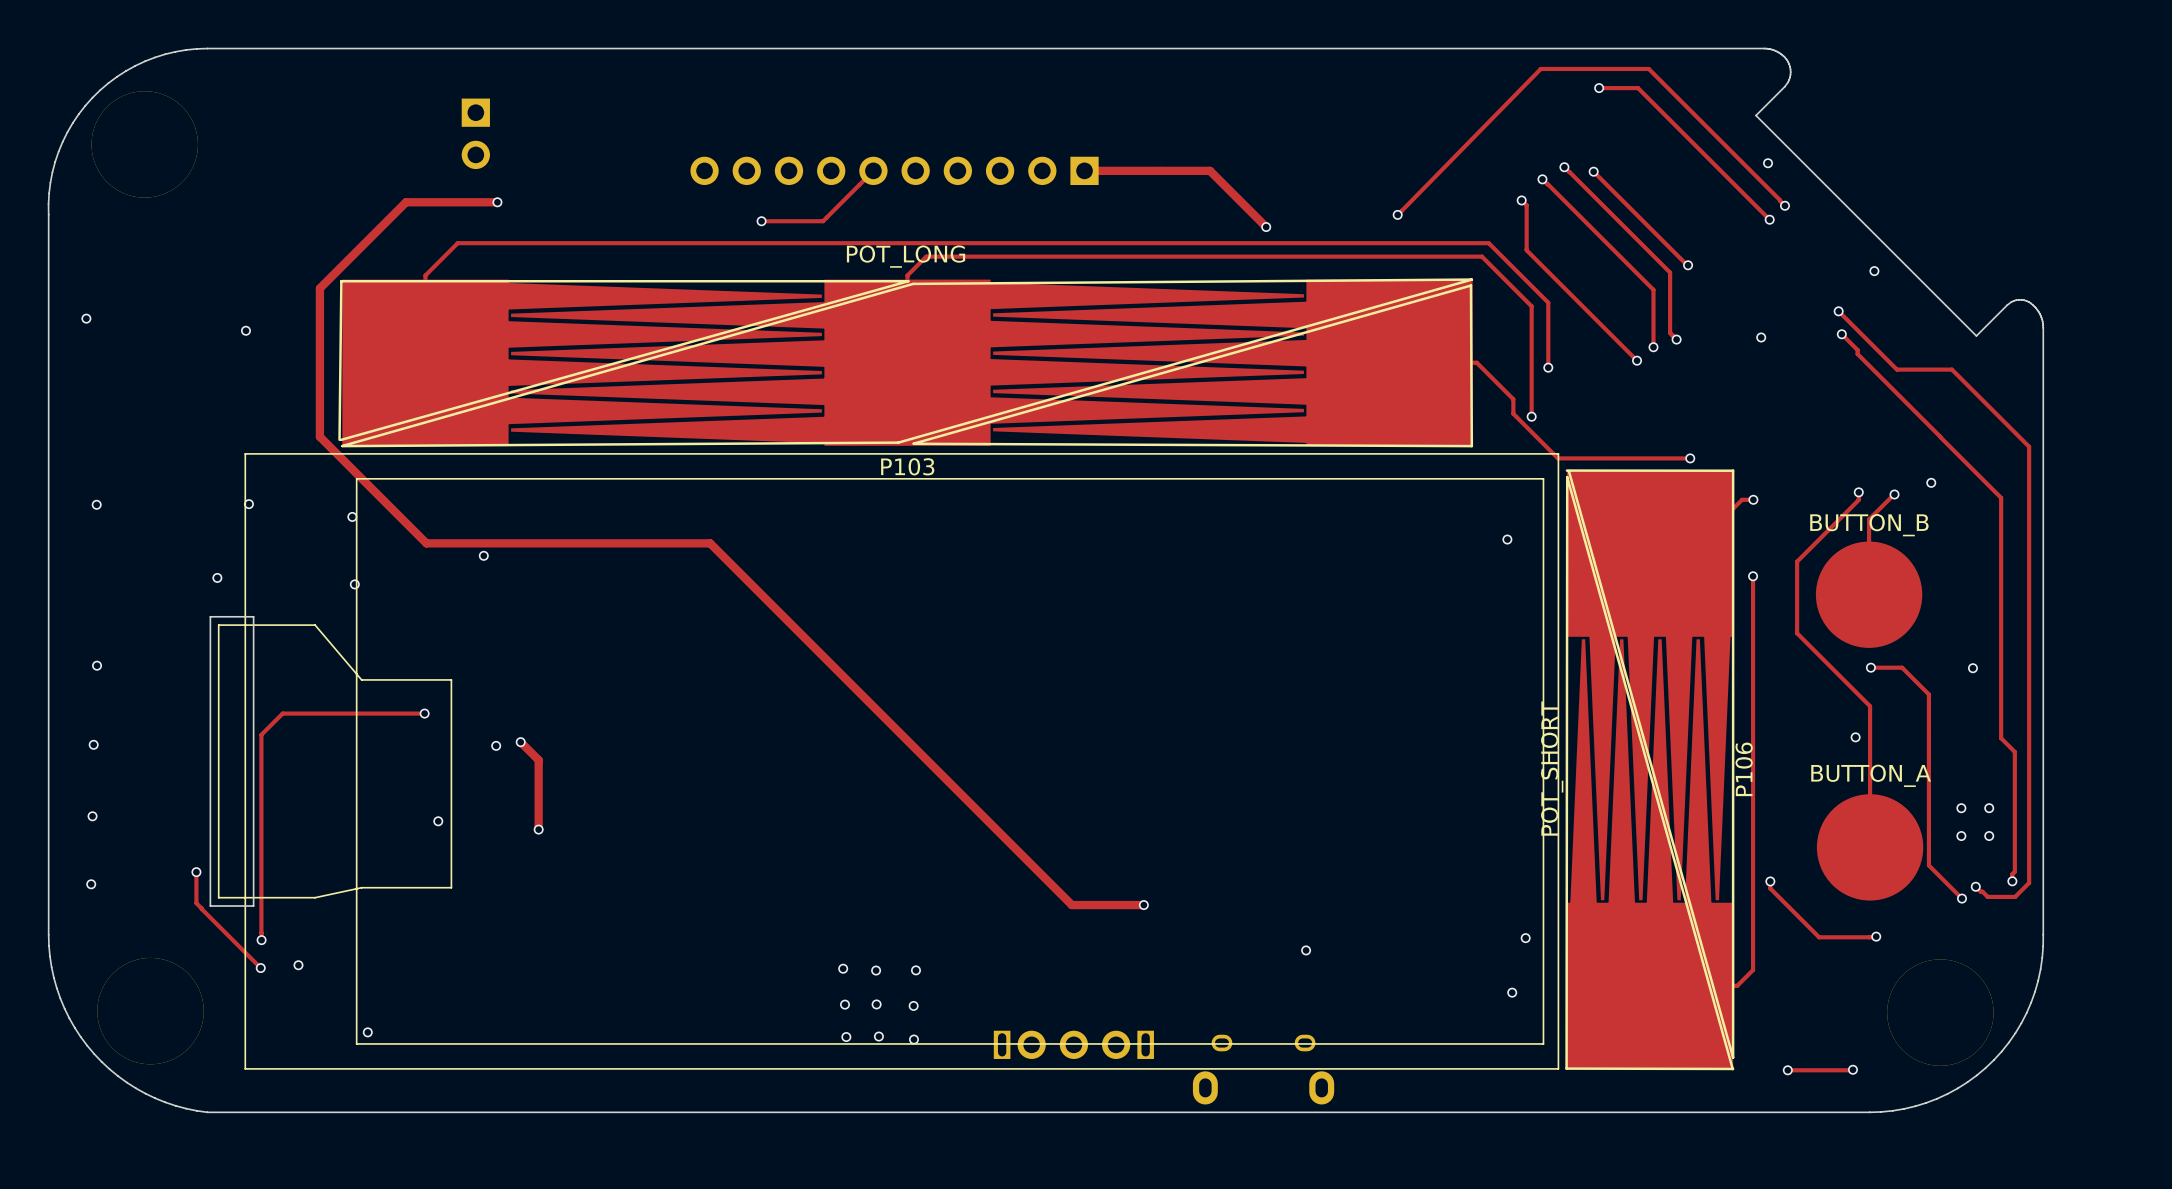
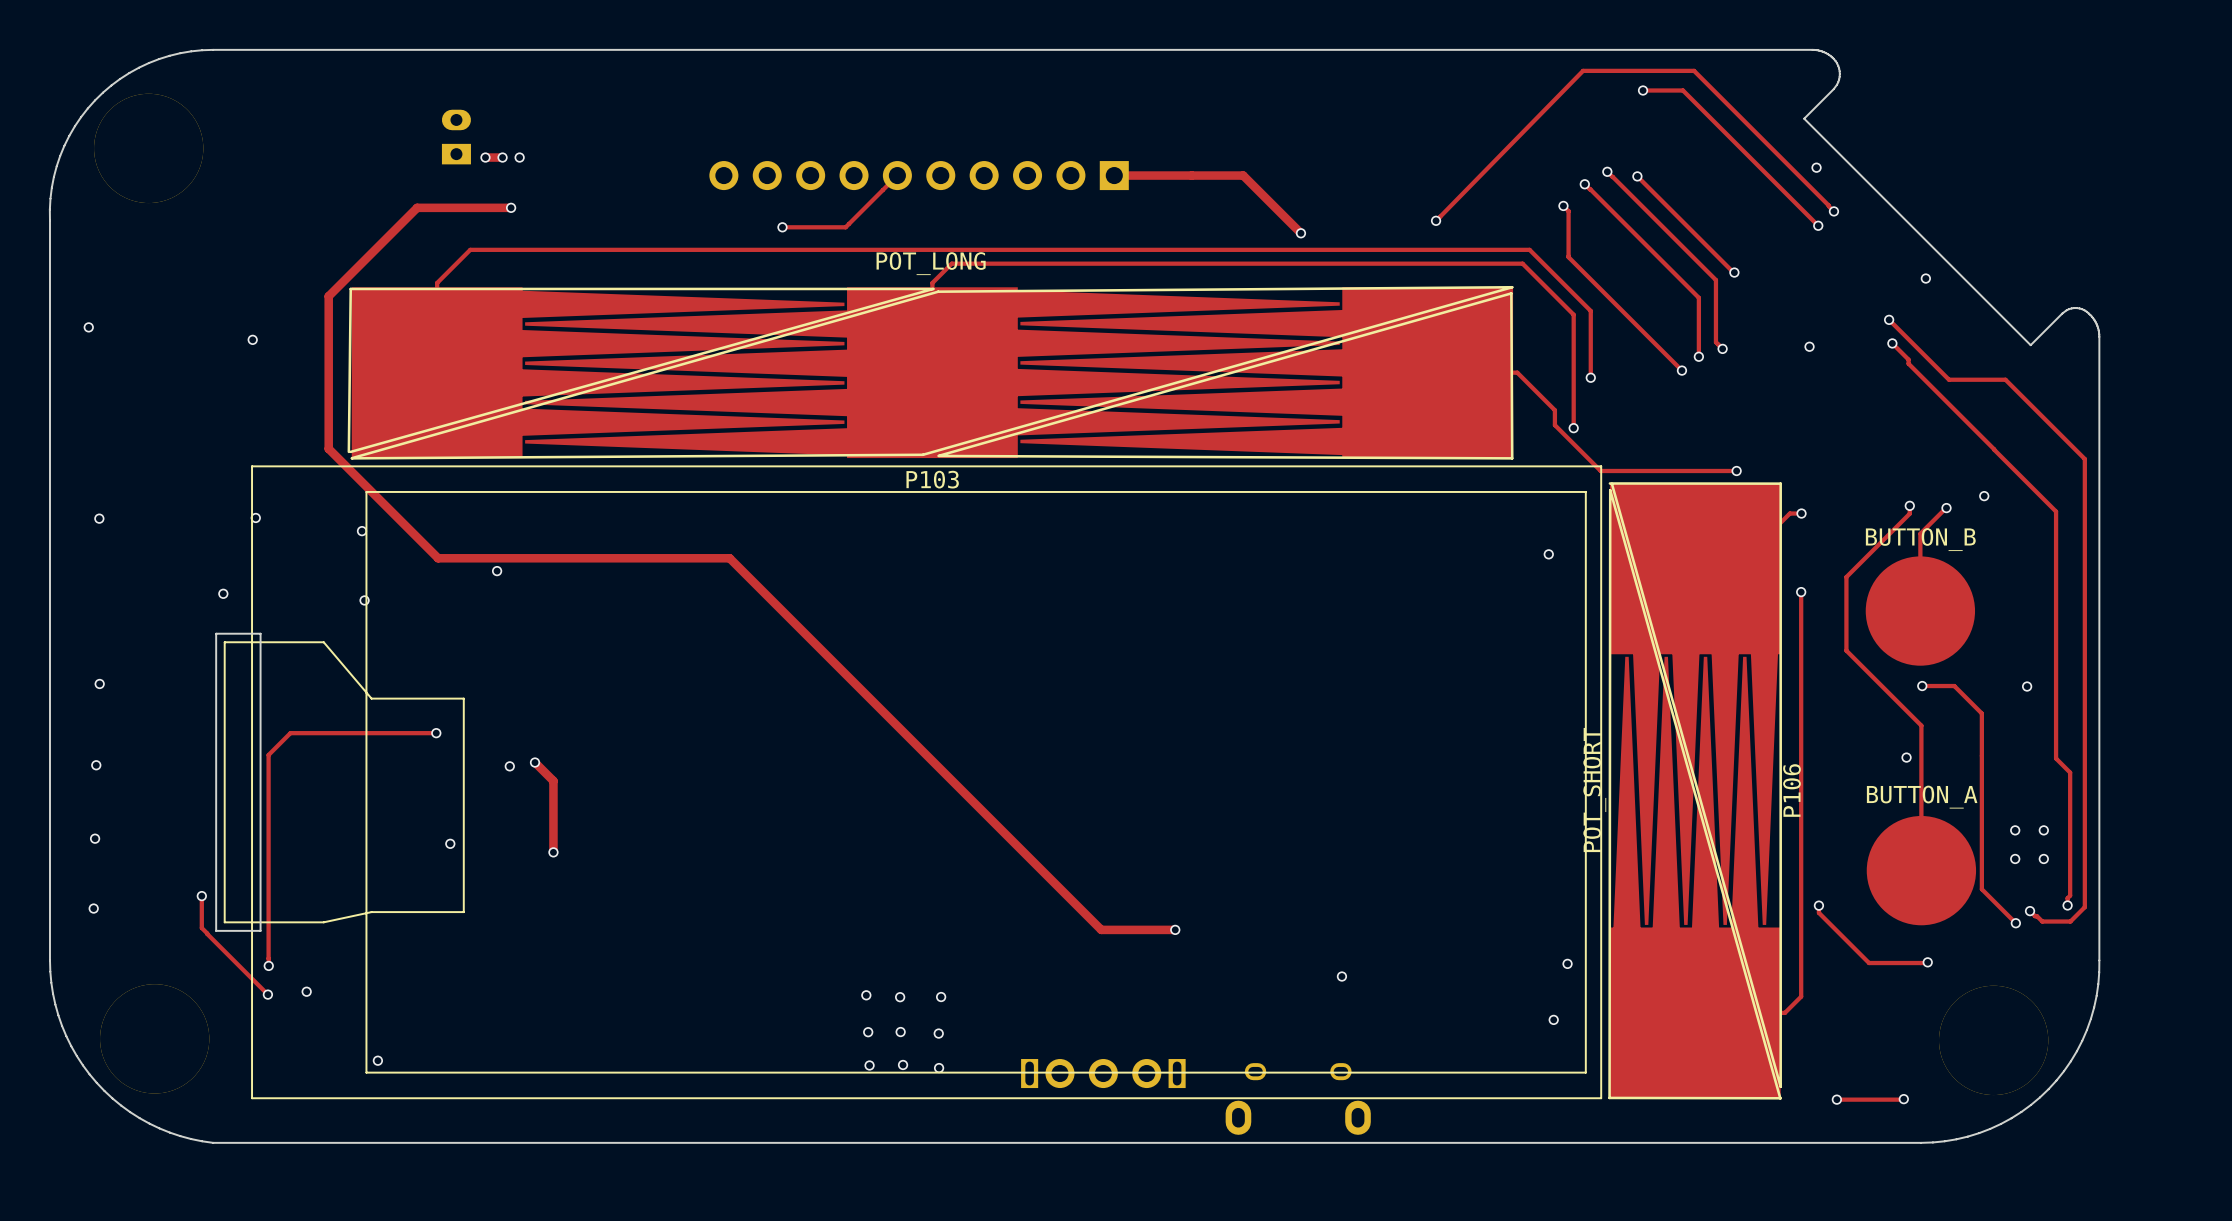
part: none -> (456, 137)
part: (475, 133) -> none
track: none -> (485, 157) (502, 157)
via: none -> (485, 157)
via: none -> (502, 157)
via: none -> (519, 157)

